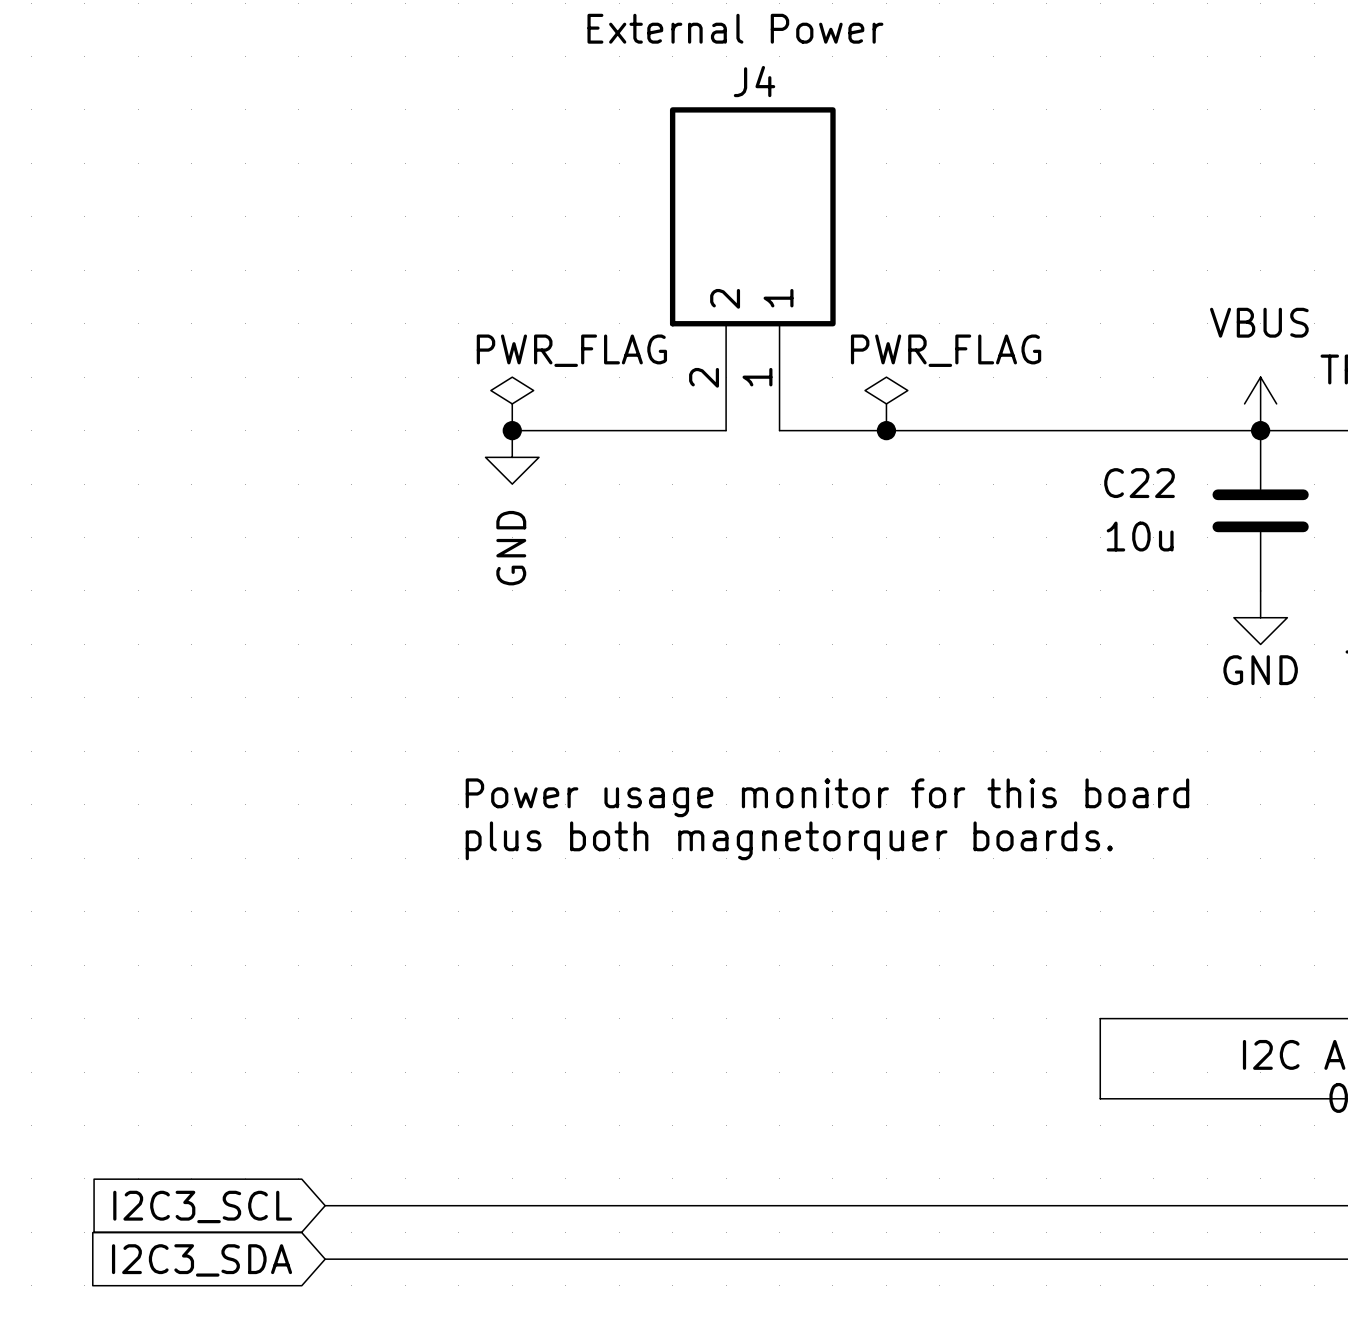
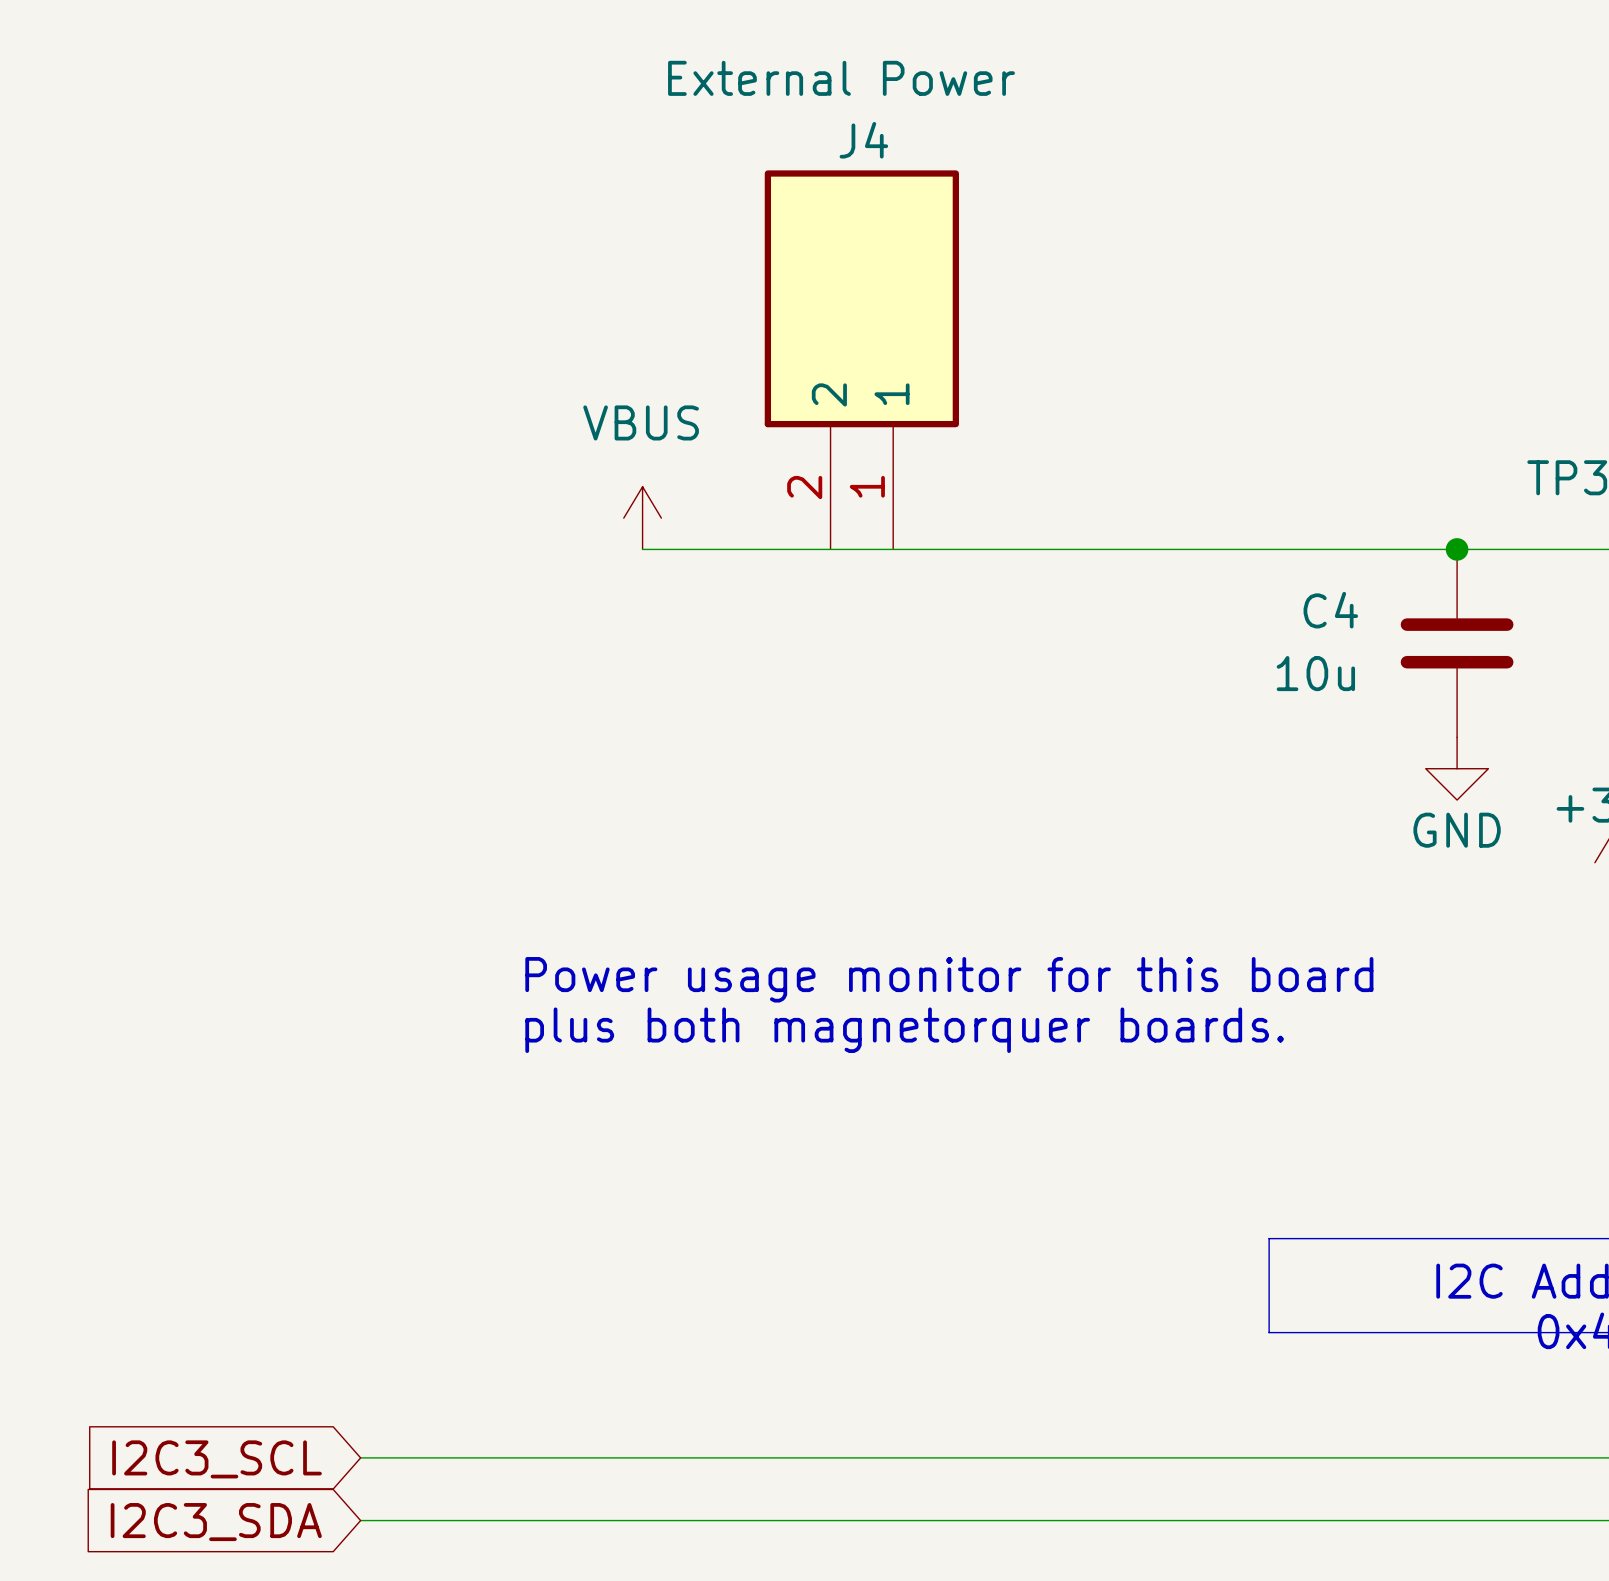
power symbol: PWR_FLAG (512, 403) -> none
power symbol: none -> VBUS (642, 518)
power symbol: PWR_FLAG (886, 403) -> none
power symbol: VBUS (1260, 403) -> none
wire: (512, 430) (565, 430) -> (830, 549) (893, 549)
junction: (512, 430) -> none
junction: (886, 430) -> none
power symbol: GND (512, 457) -> none
C22 name: C22 (1139, 483) -> C4 (1330, 610)

